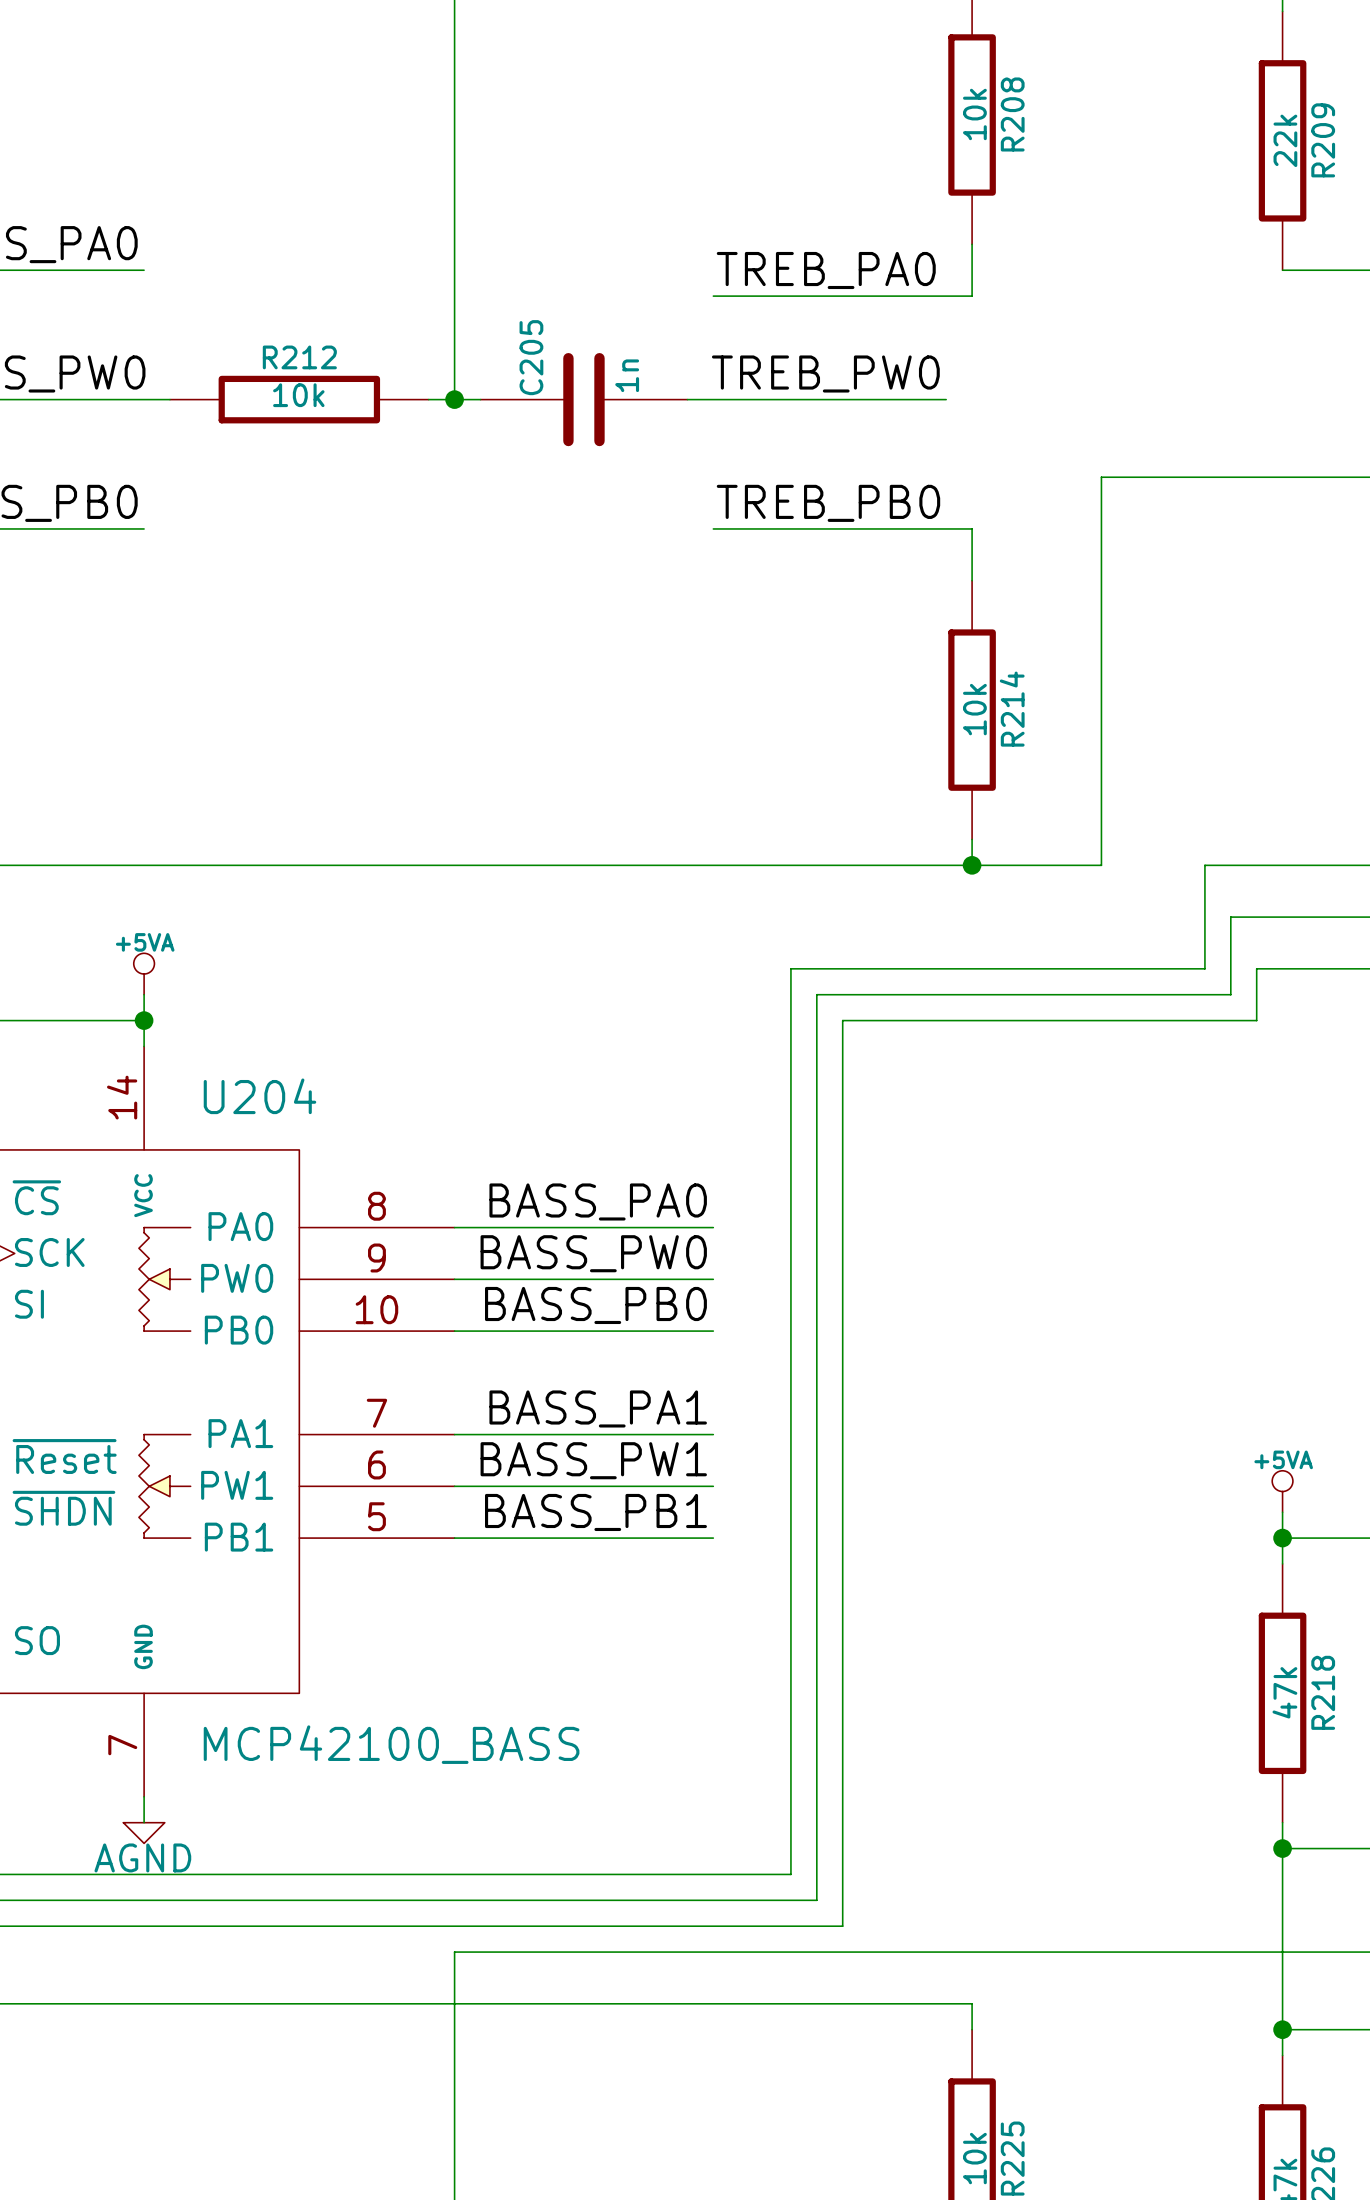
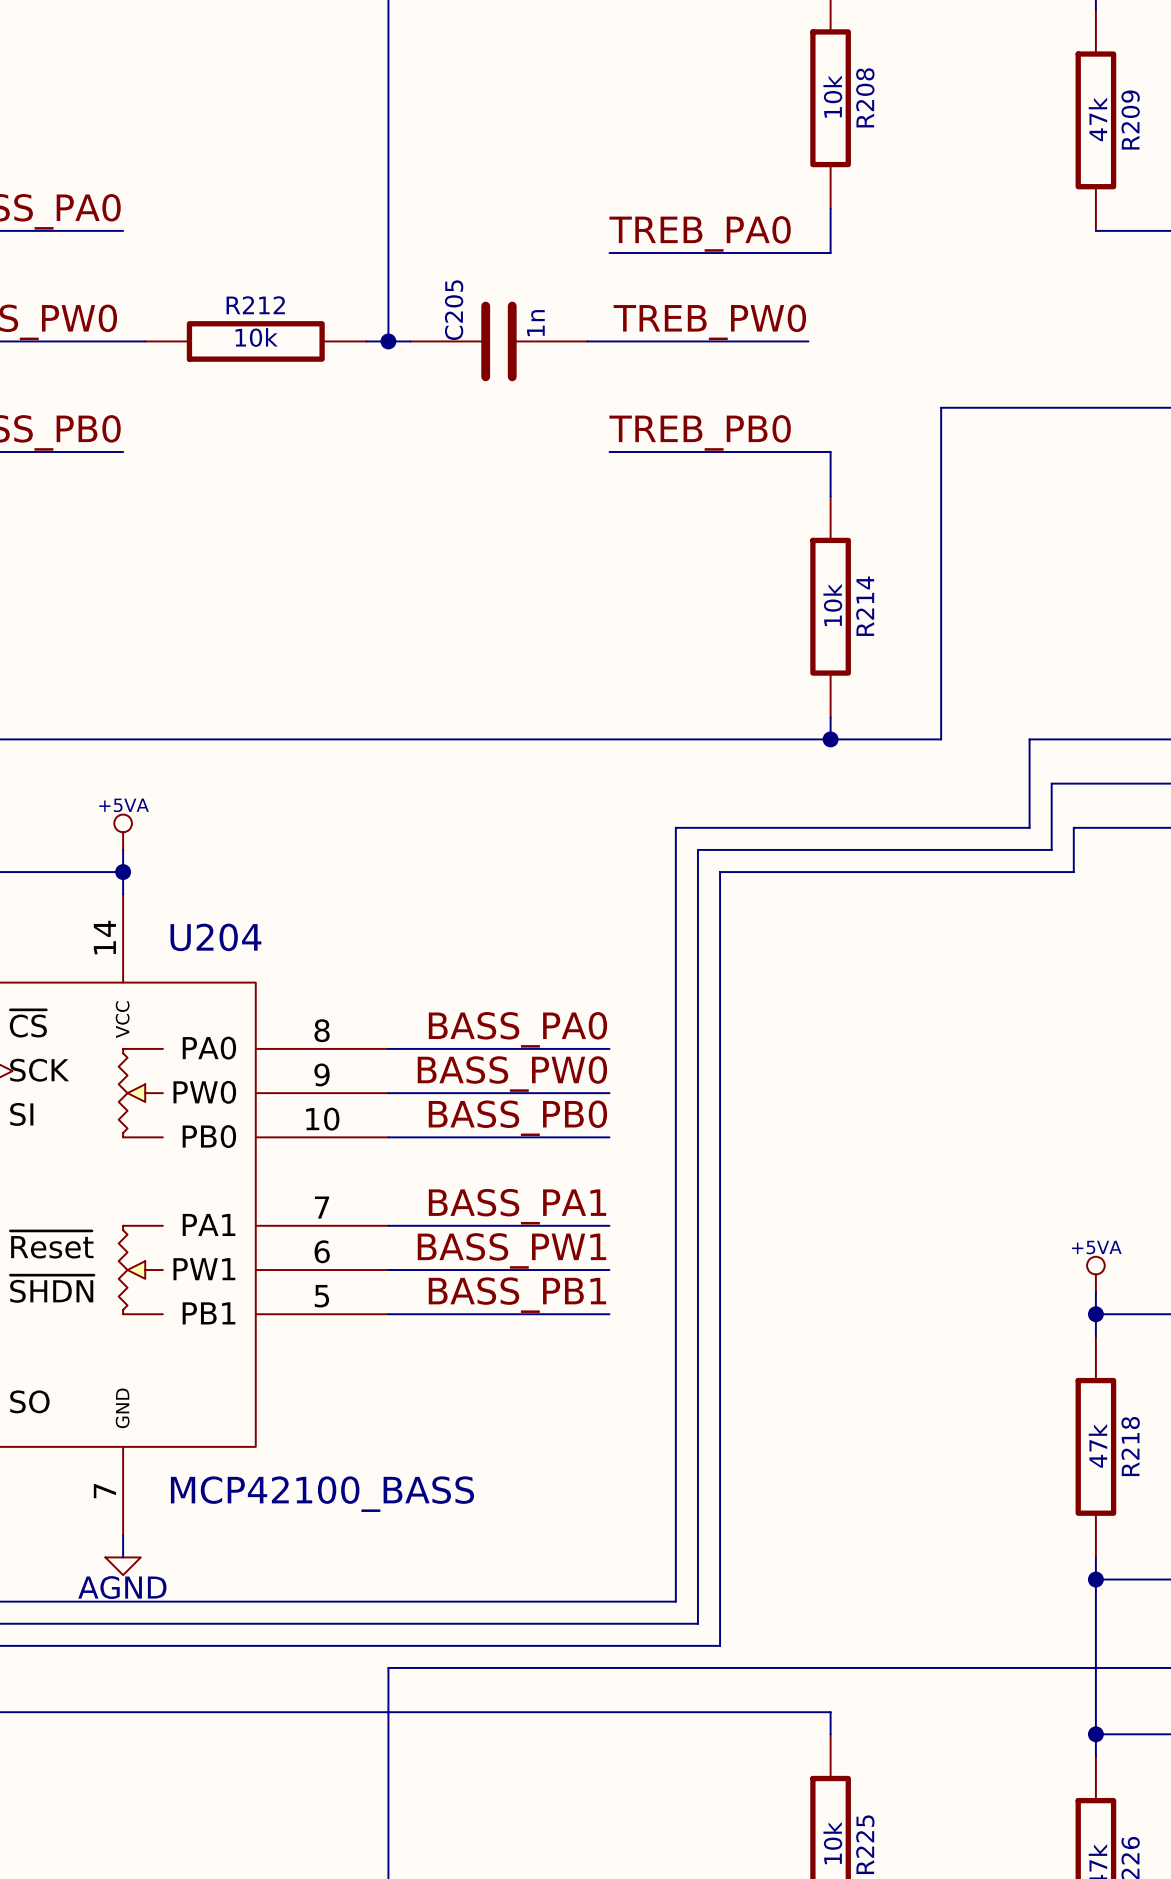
R209 value: 22k (1285, 140) -> 47k (1097, 119)

